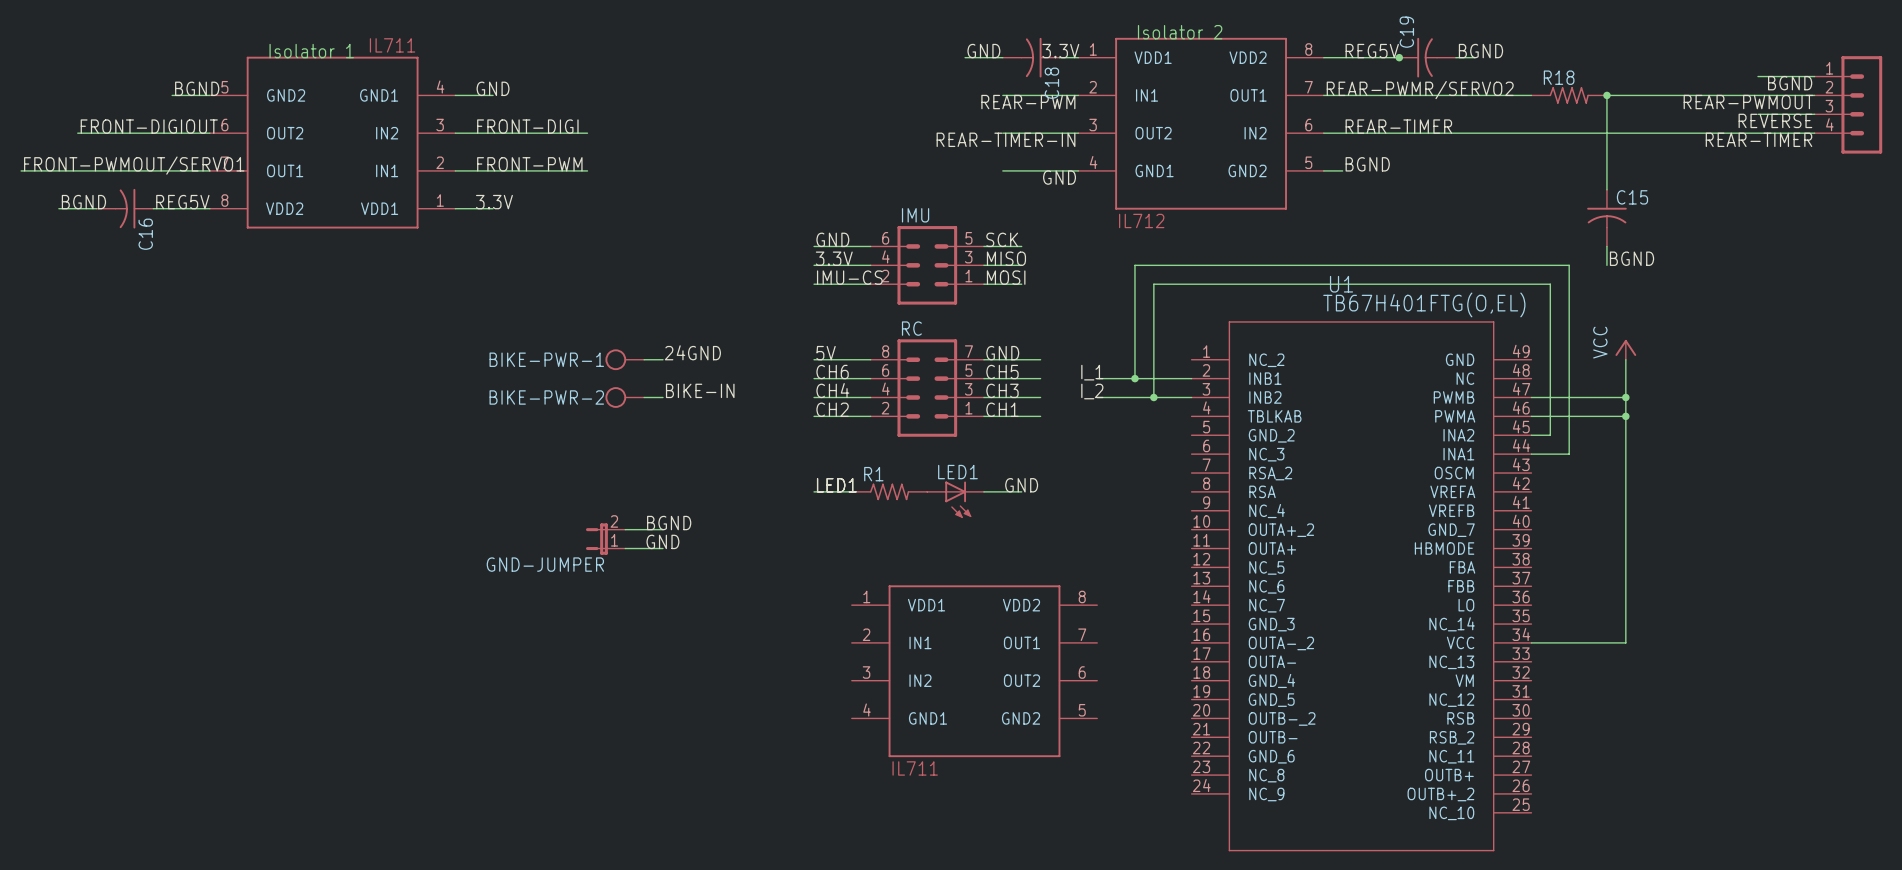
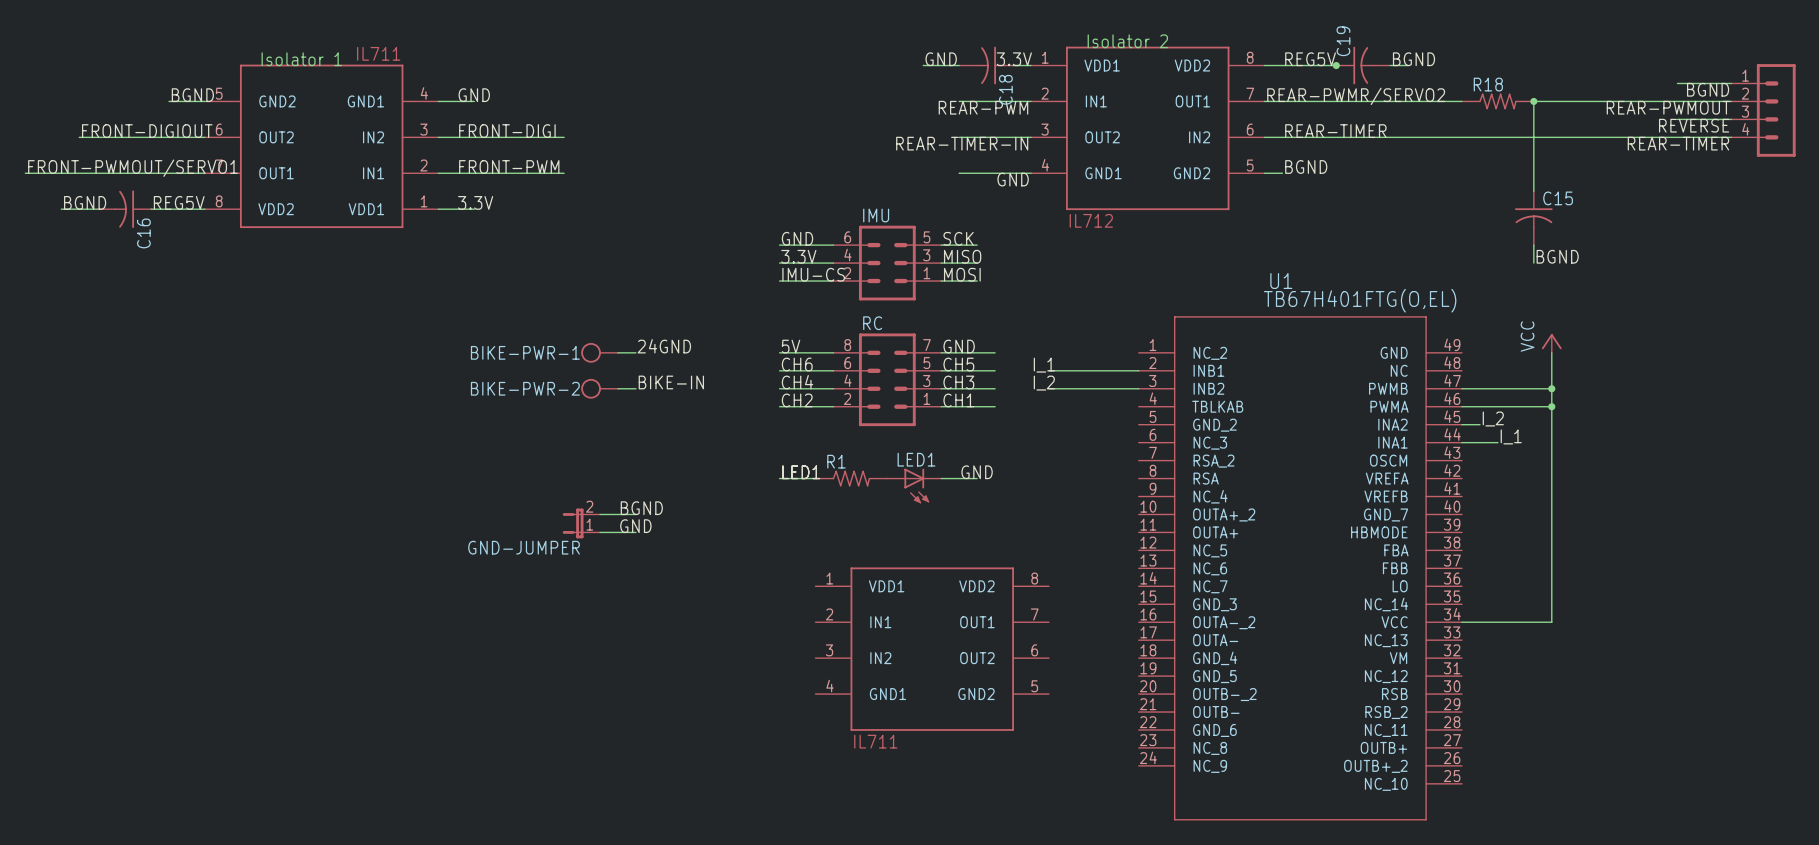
wire: (1134, 378) (1134, 265) (1569, 265) (1569, 454) -> none
junction: (1134, 378) -> none
wire: (1153, 397) (1153, 284) (1550, 284) (1550, 435) -> none
junction: (1153, 397) -> none
label: none -> I_2 (1493, 418)
label: none -> I_1 (1511, 436)

